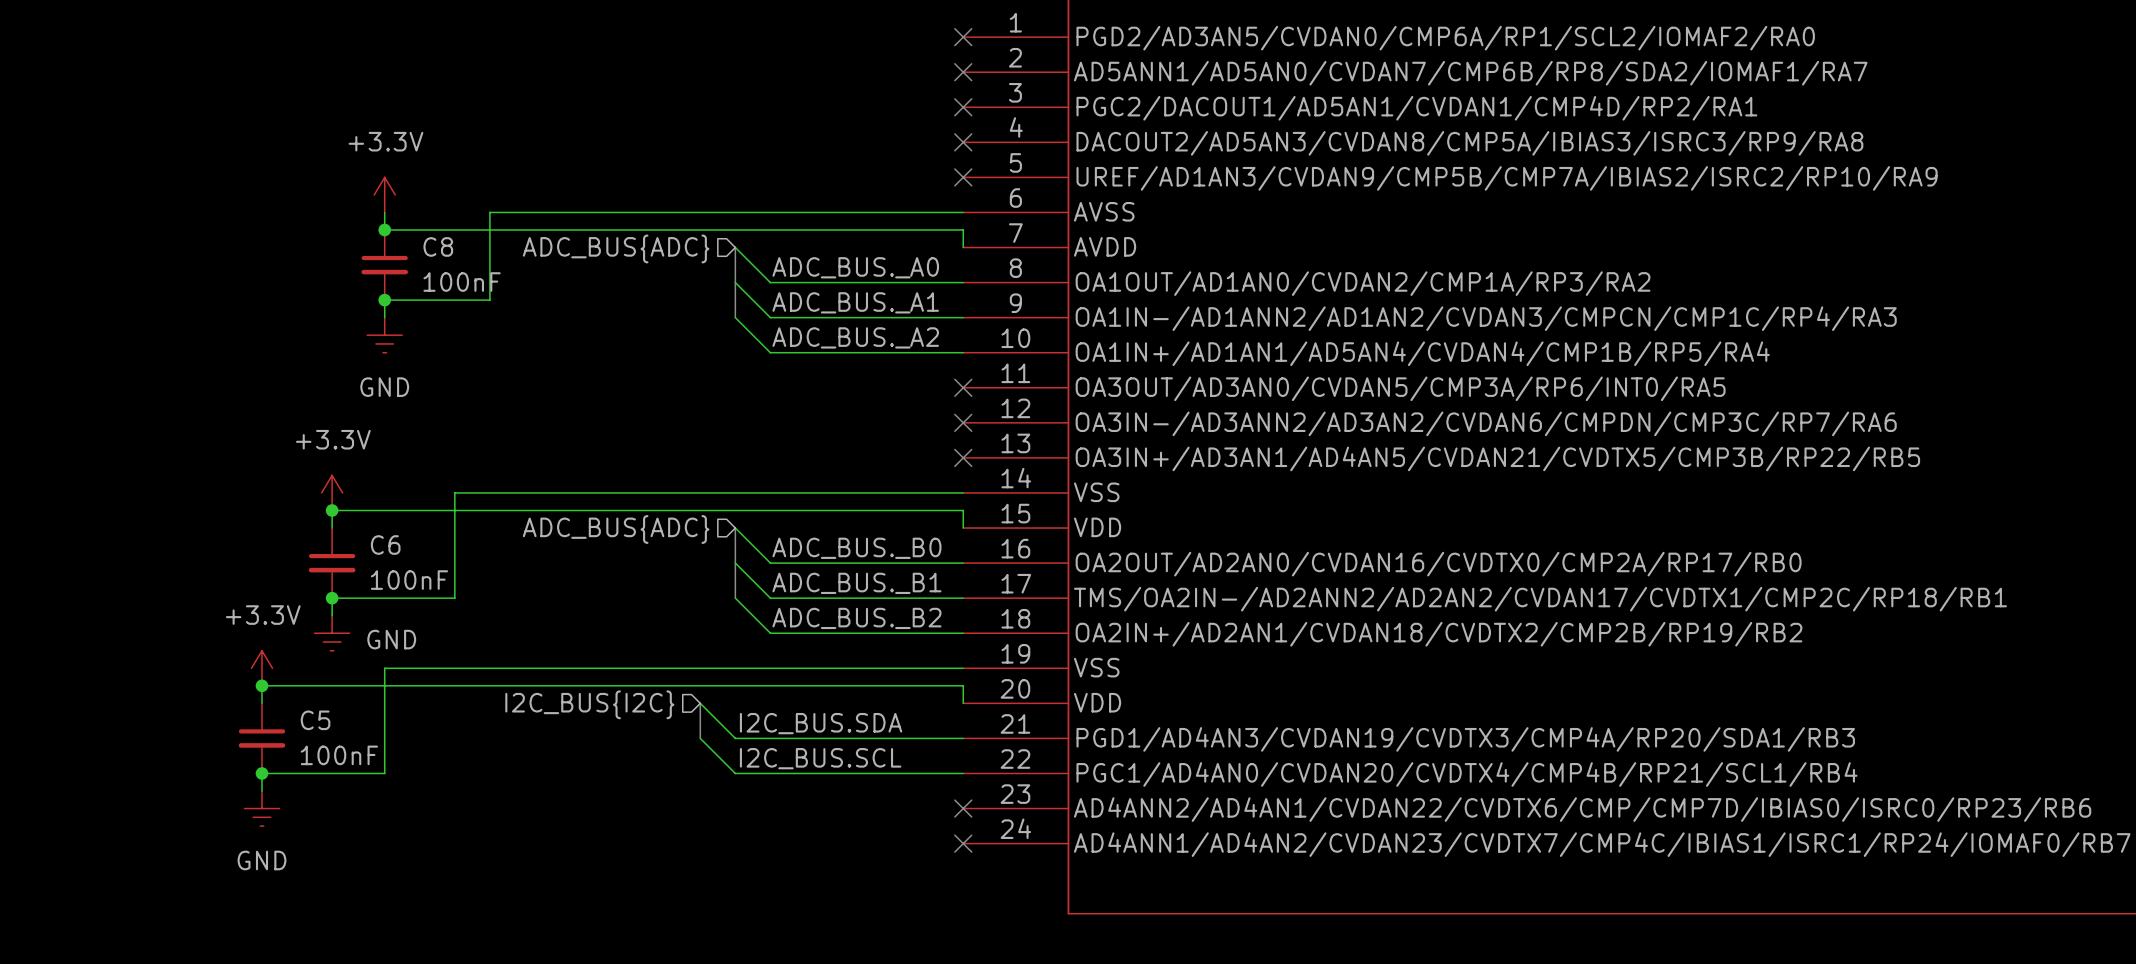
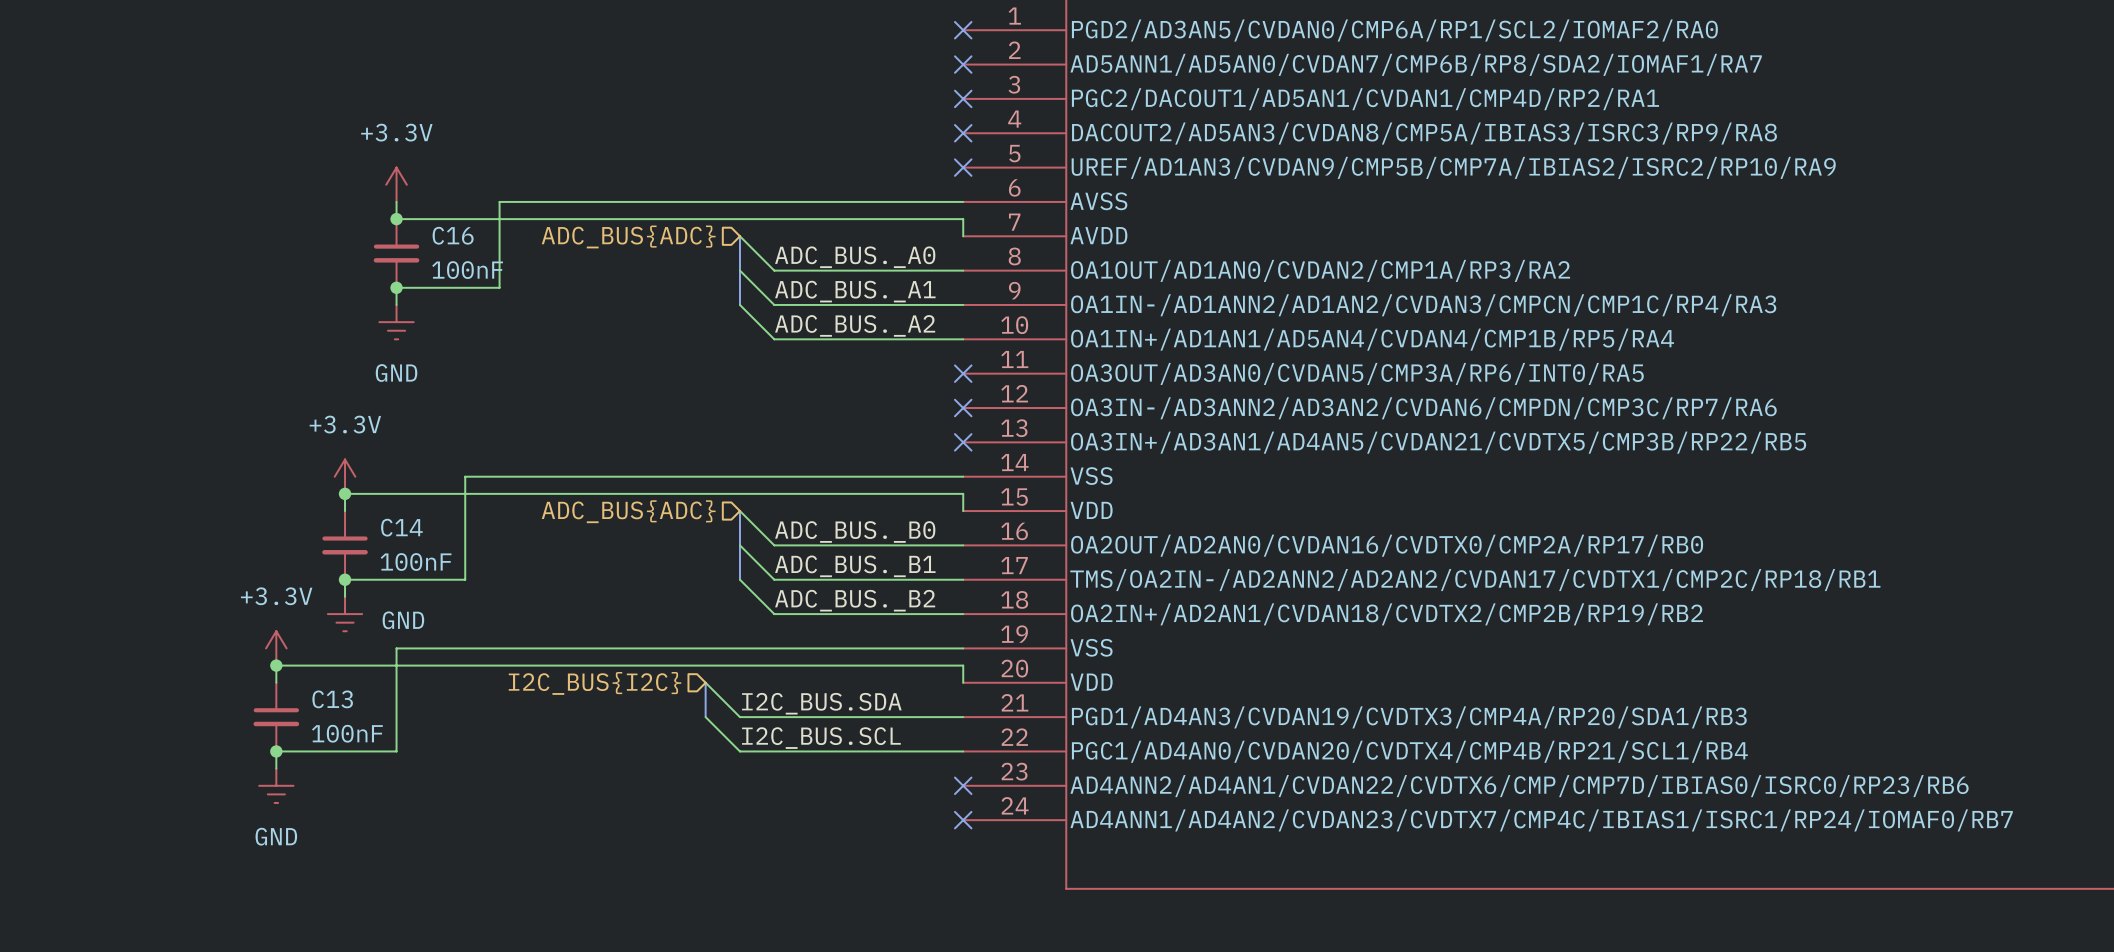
C8 name: C8 (438, 246) -> C16 (453, 235)
C6 name: C6 (385, 545) -> C14 (401, 527)
C5 name: C5 (315, 720) -> C13 (332, 699)

